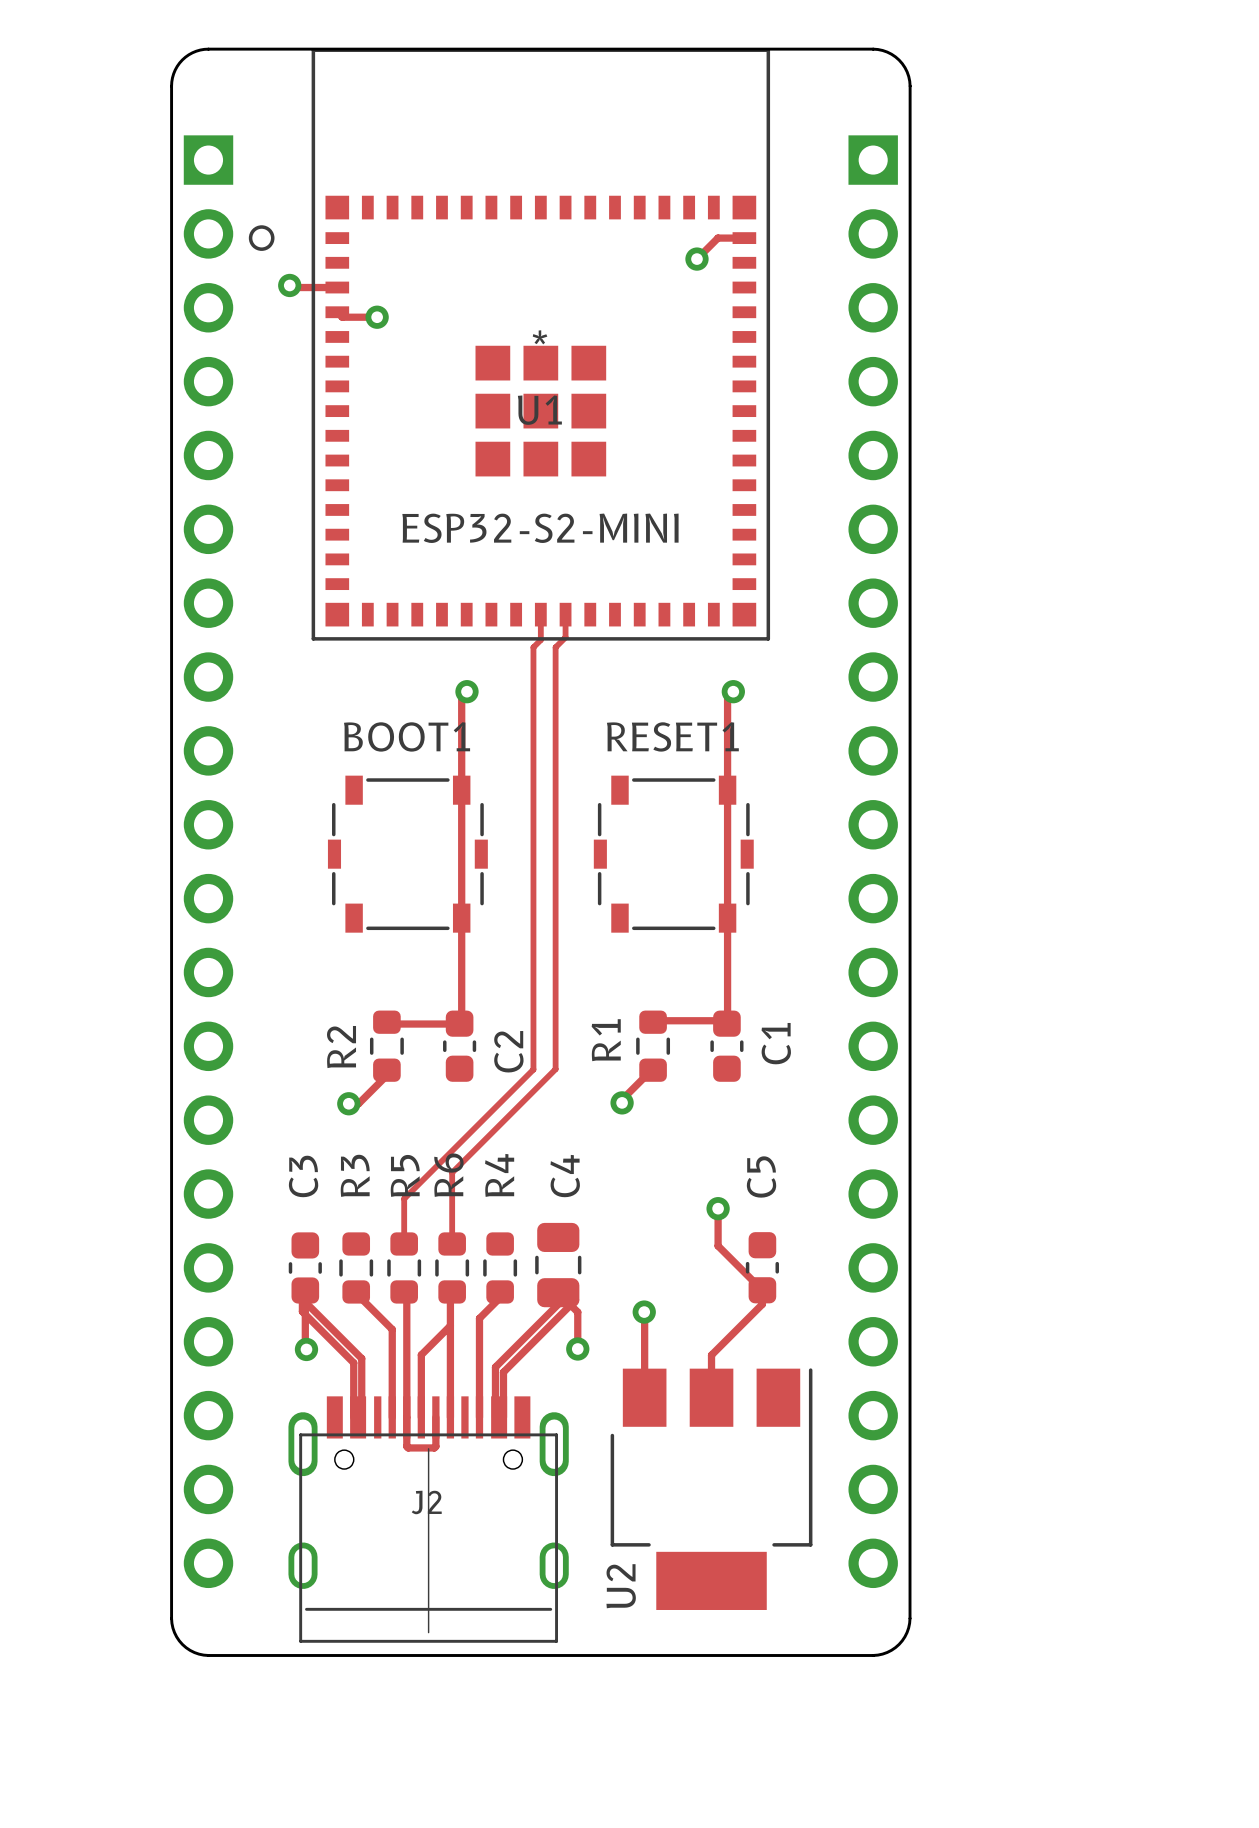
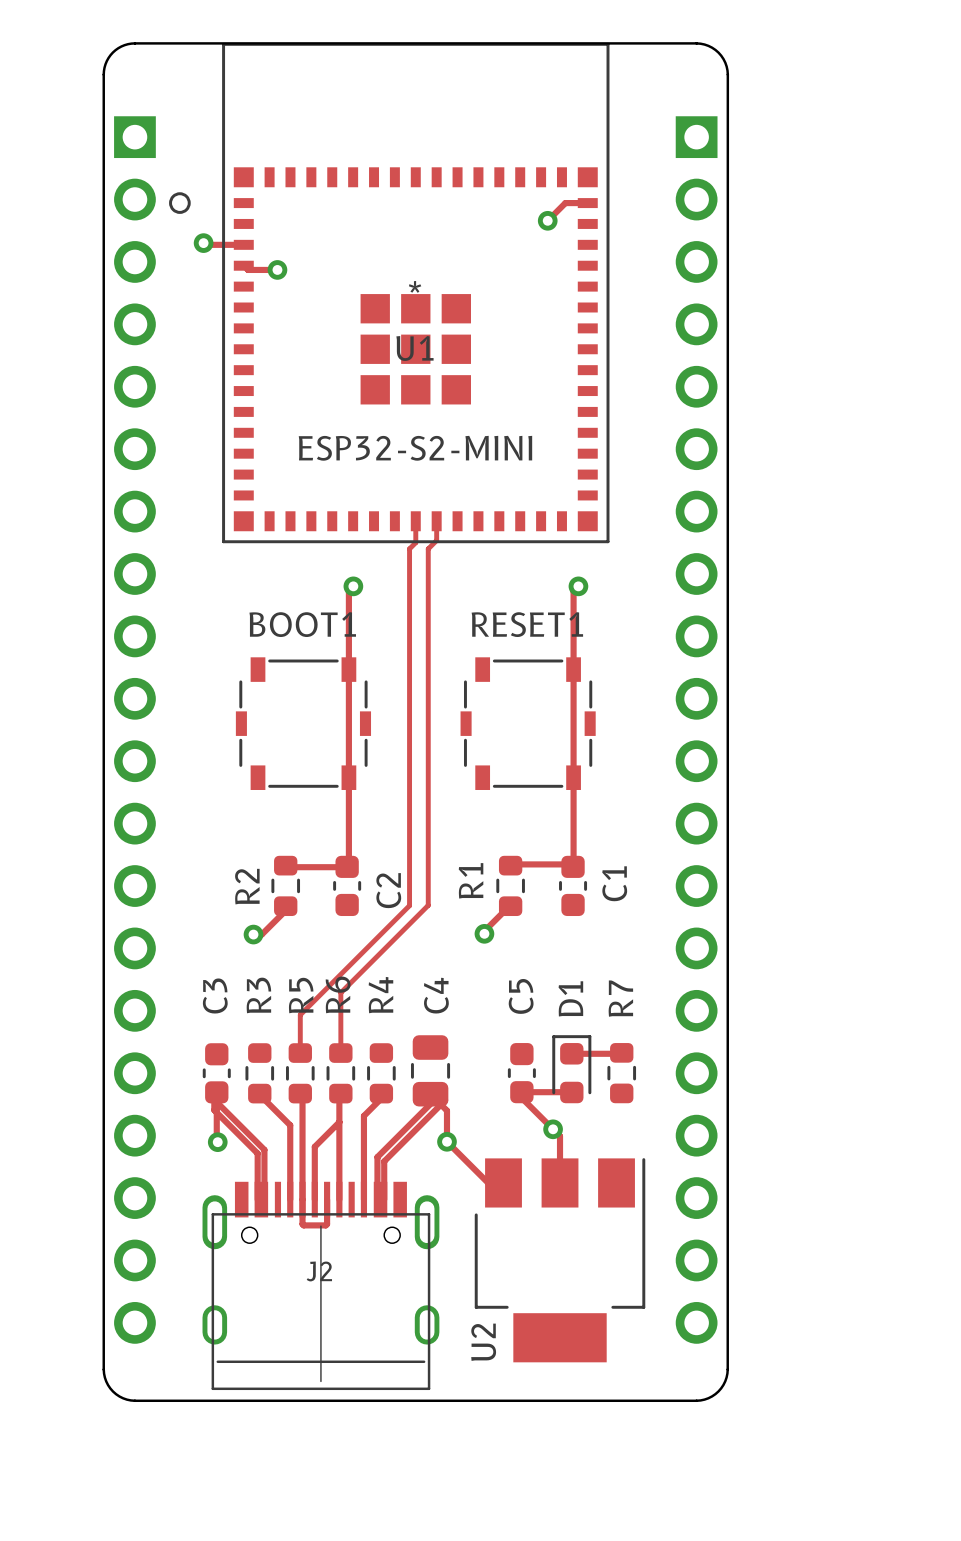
track: (718, 1208) (718, 1245) (762, 1290) (762, 1304) (711, 1355) -> (571, 1092) (521, 1092) (521, 1098) (560, 1136) (560, 1146)
via: (718, 1208) -> none
track: none -> (621, 1052) (571, 1053)
D1: none -> (571, 1069)
C5 position: (762, 1267) -> (521, 1073)
R7: none -> (621, 1073)
track: (644, 1312) (644, 1397) -> (446, 1141) (488, 1182) (503, 1182)
via: (644, 1312) -> none
via: none -> (553, 1129)

